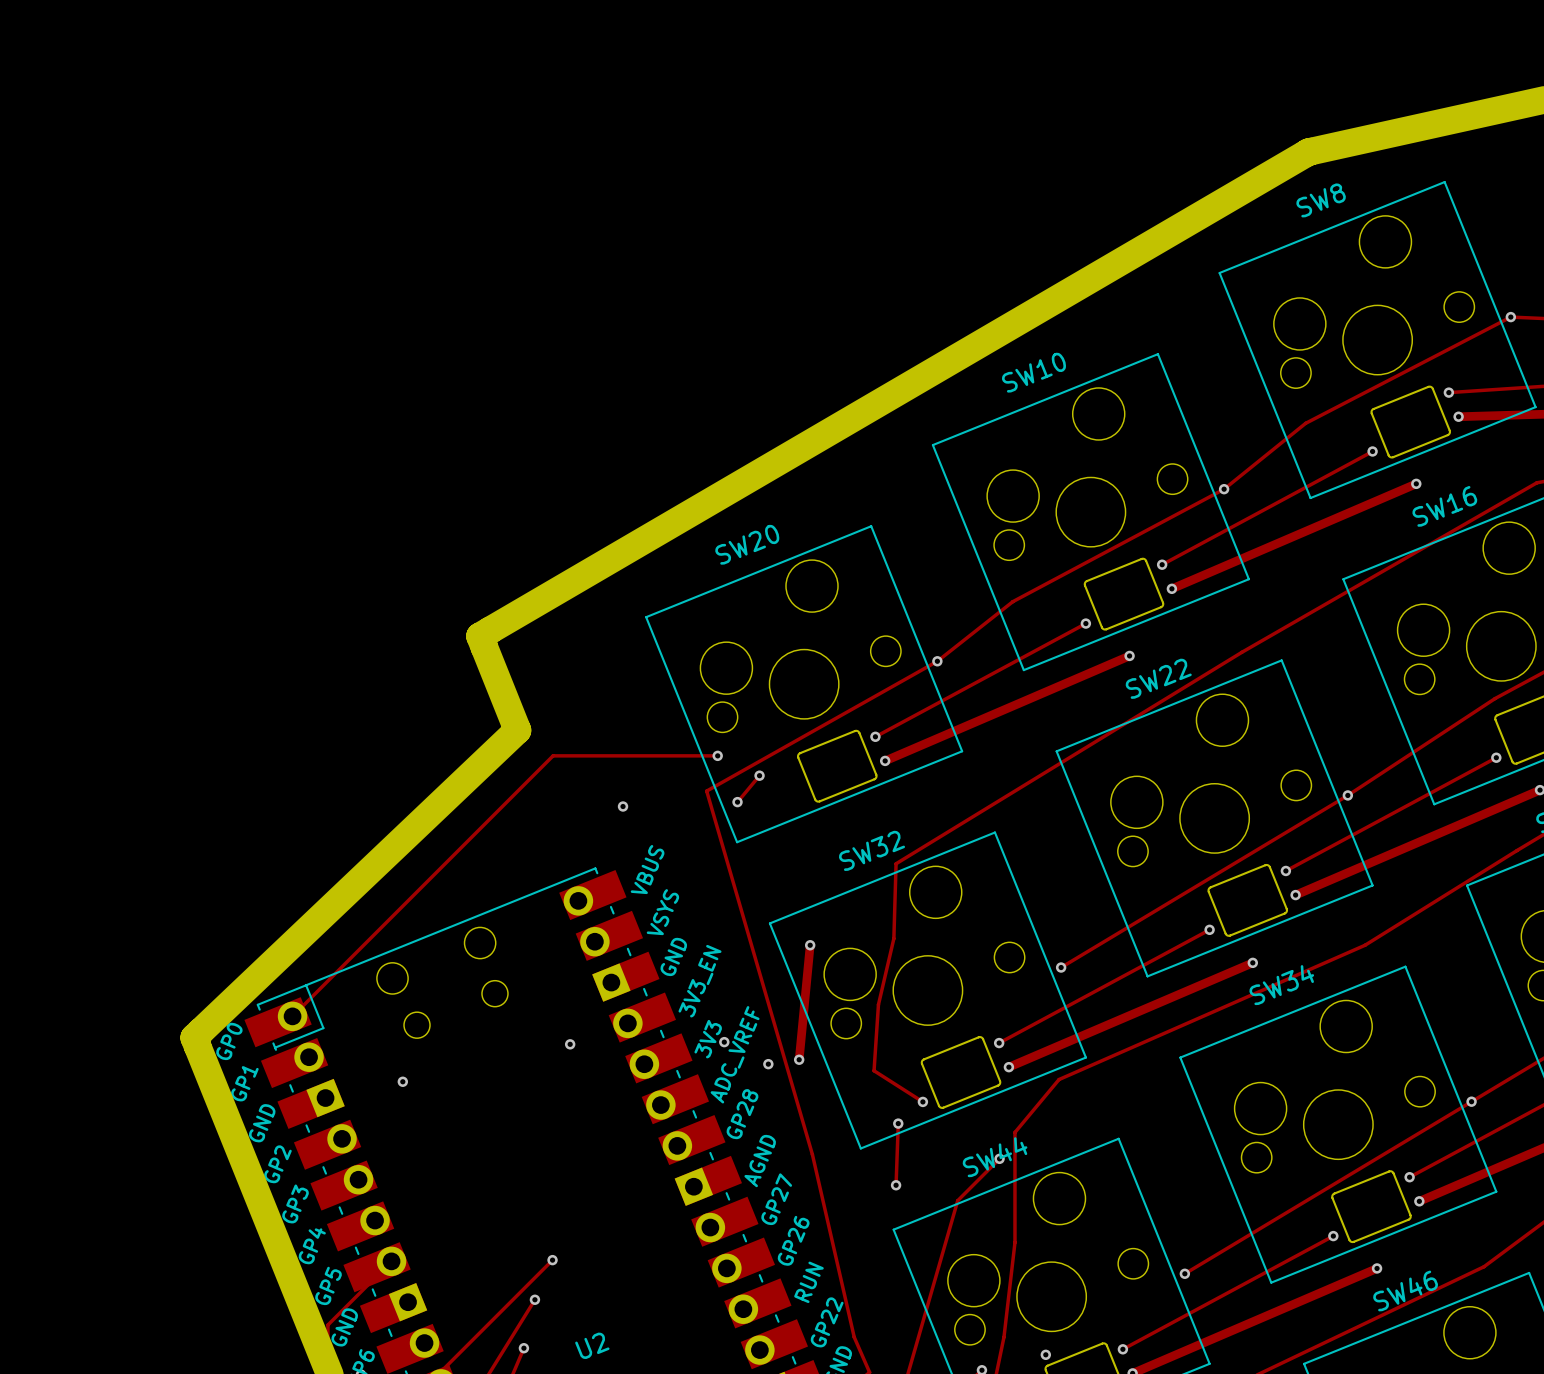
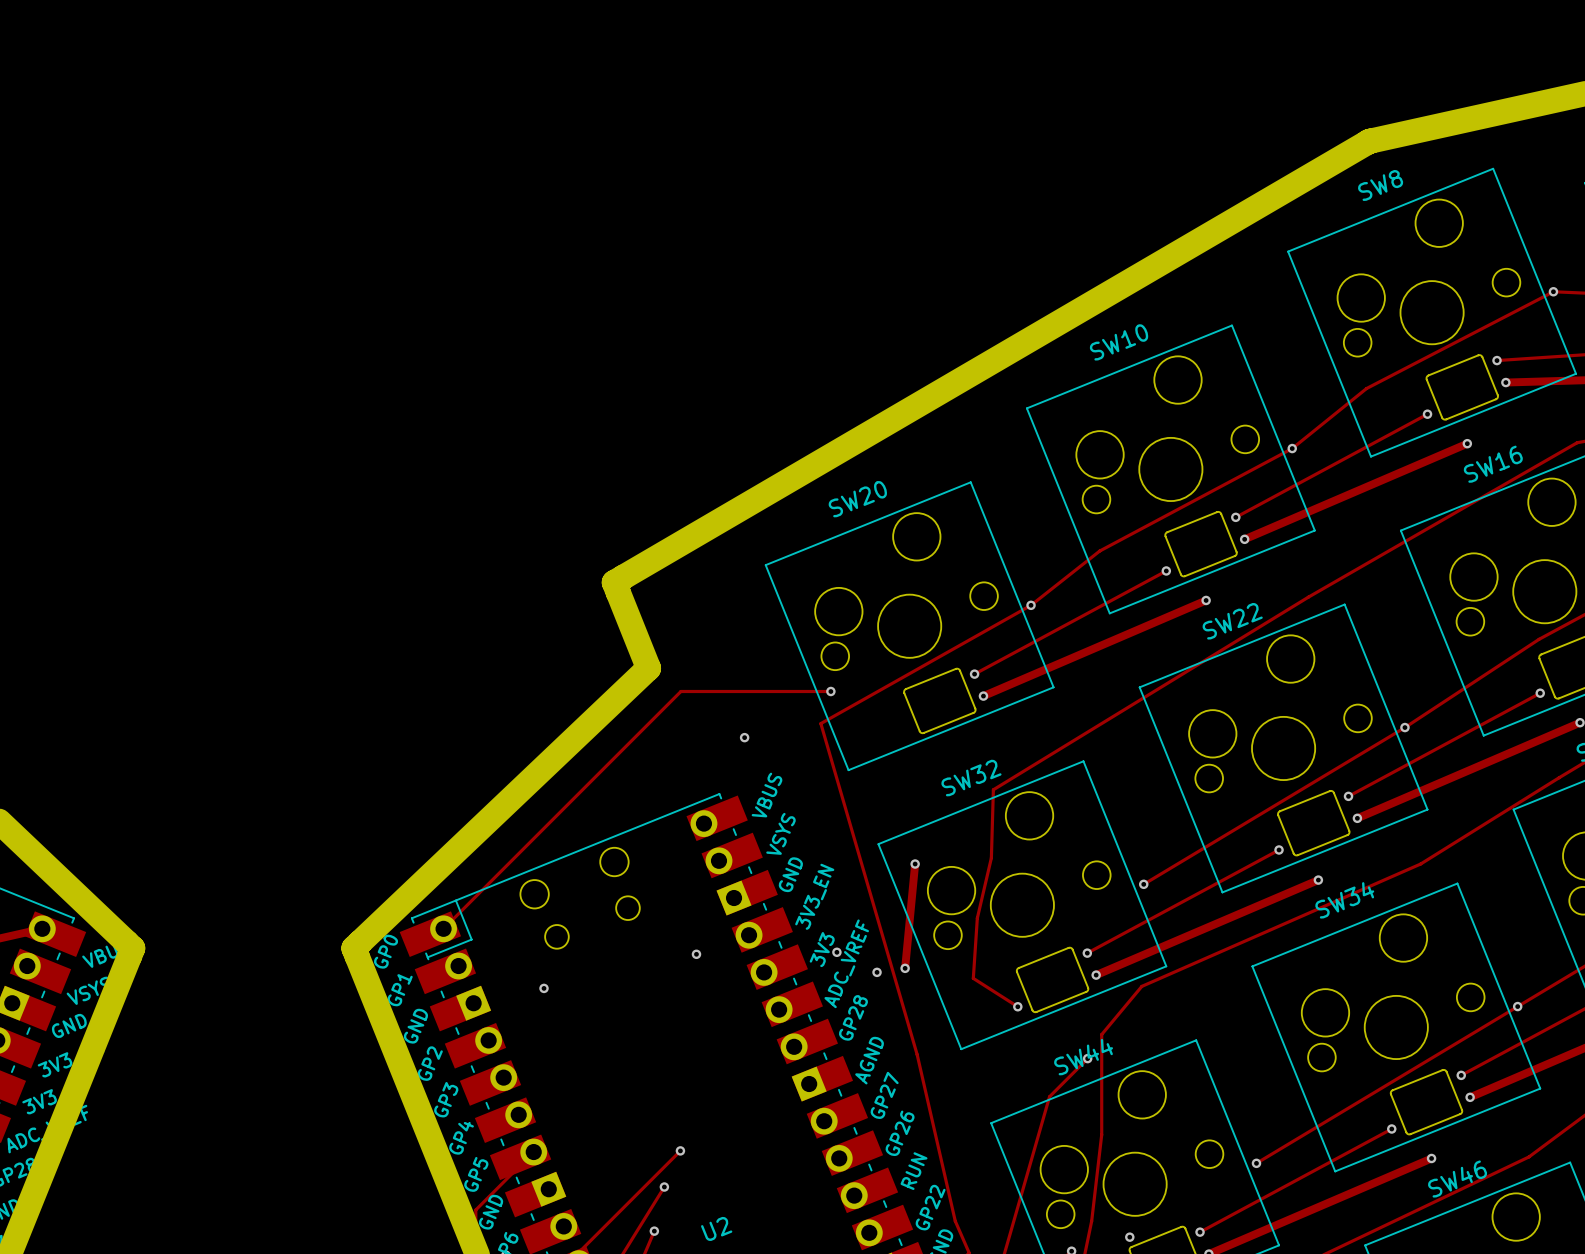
track: (759, 775) (737, 802) -> none
via: (759, 775) -> none
via: (737, 802) -> none
track: (898, 1123) (896, 1185) -> none
via: (898, 1123) -> none
via: (896, 1185) -> none

